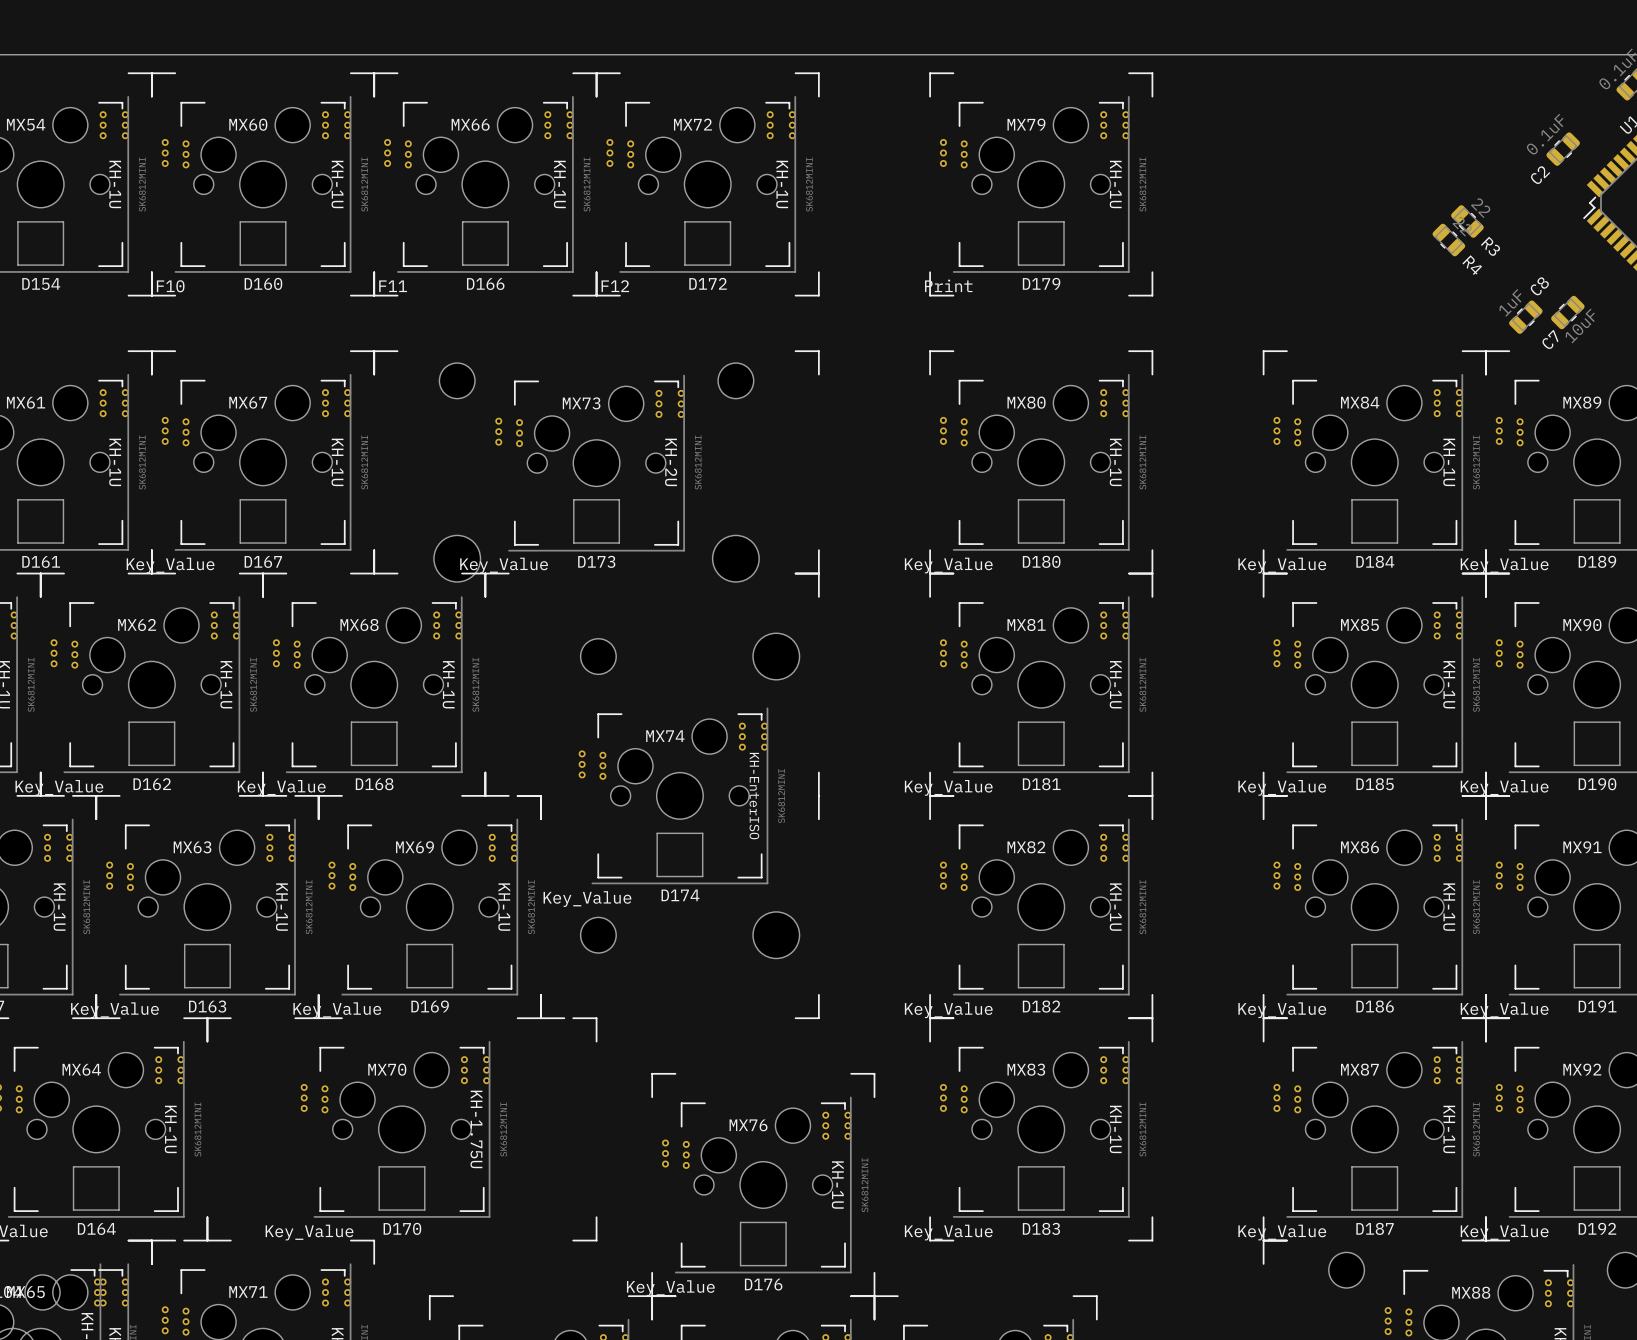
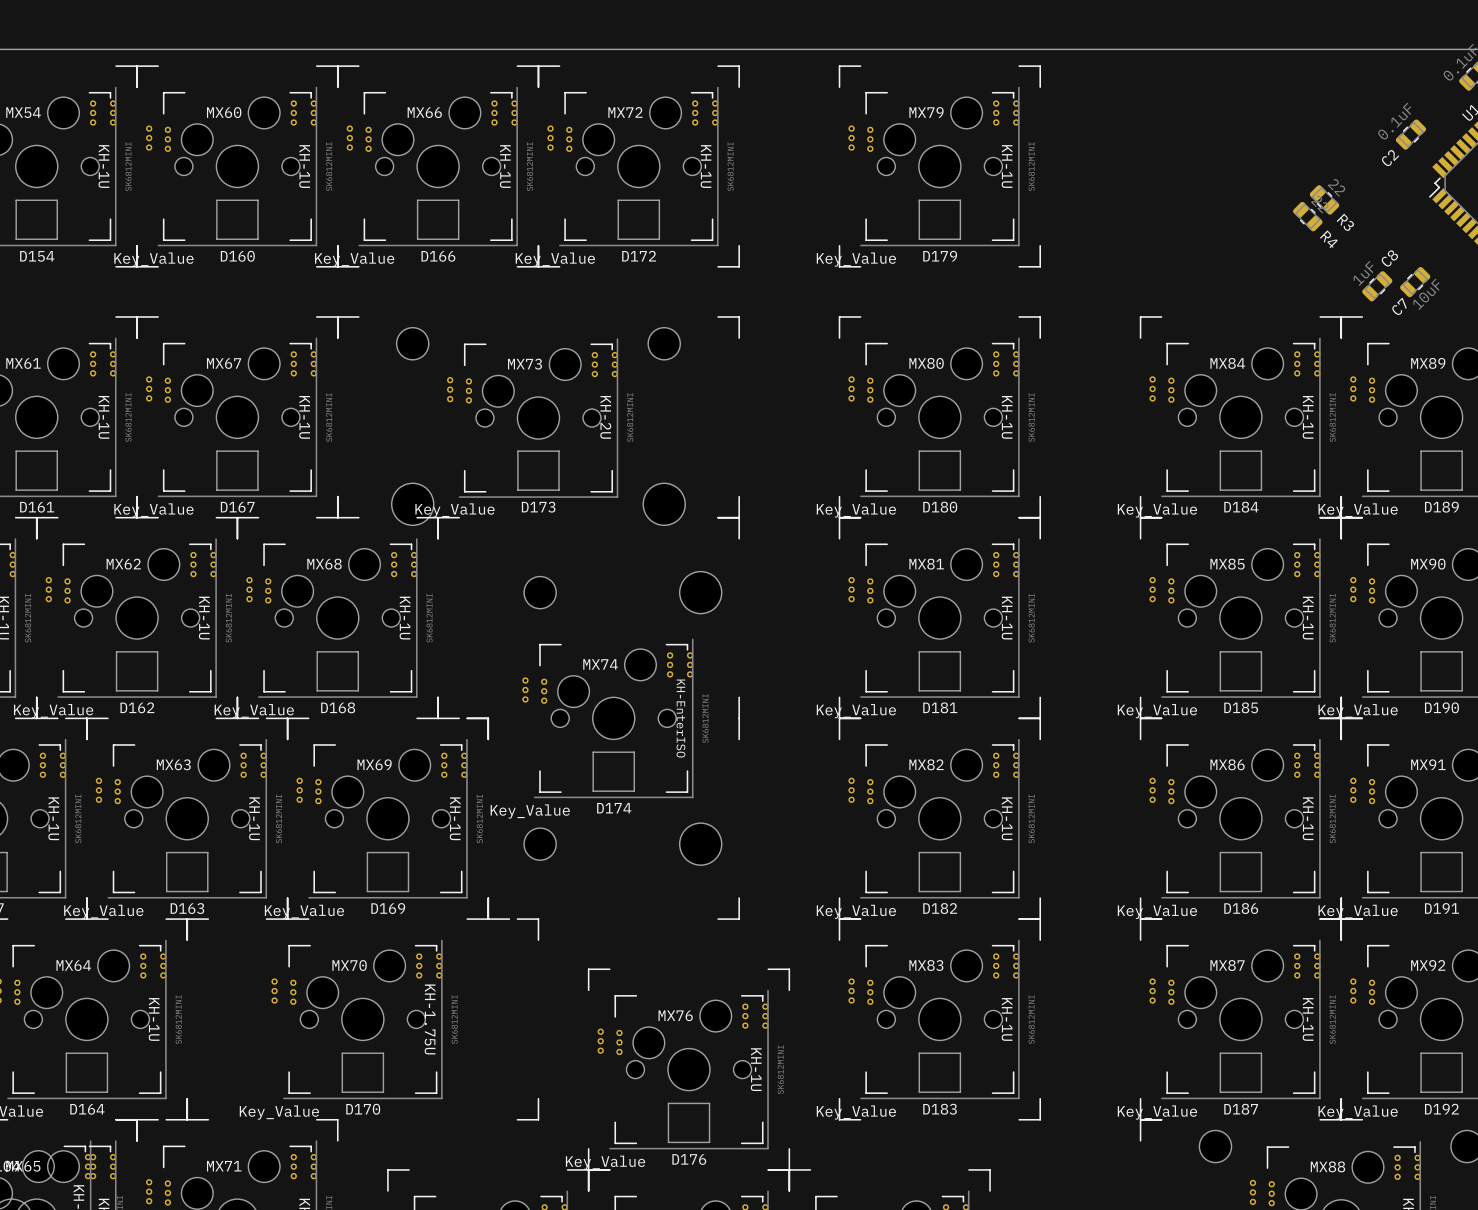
part text: Print (948, 285) -> Key_Value (856, 259)
part text: F10 (170, 286) -> Key_Value (153, 259)
part text: F11 (393, 286) -> Key_Value (354, 259)
part text: F12 (615, 286) -> Key_Value (555, 259)

